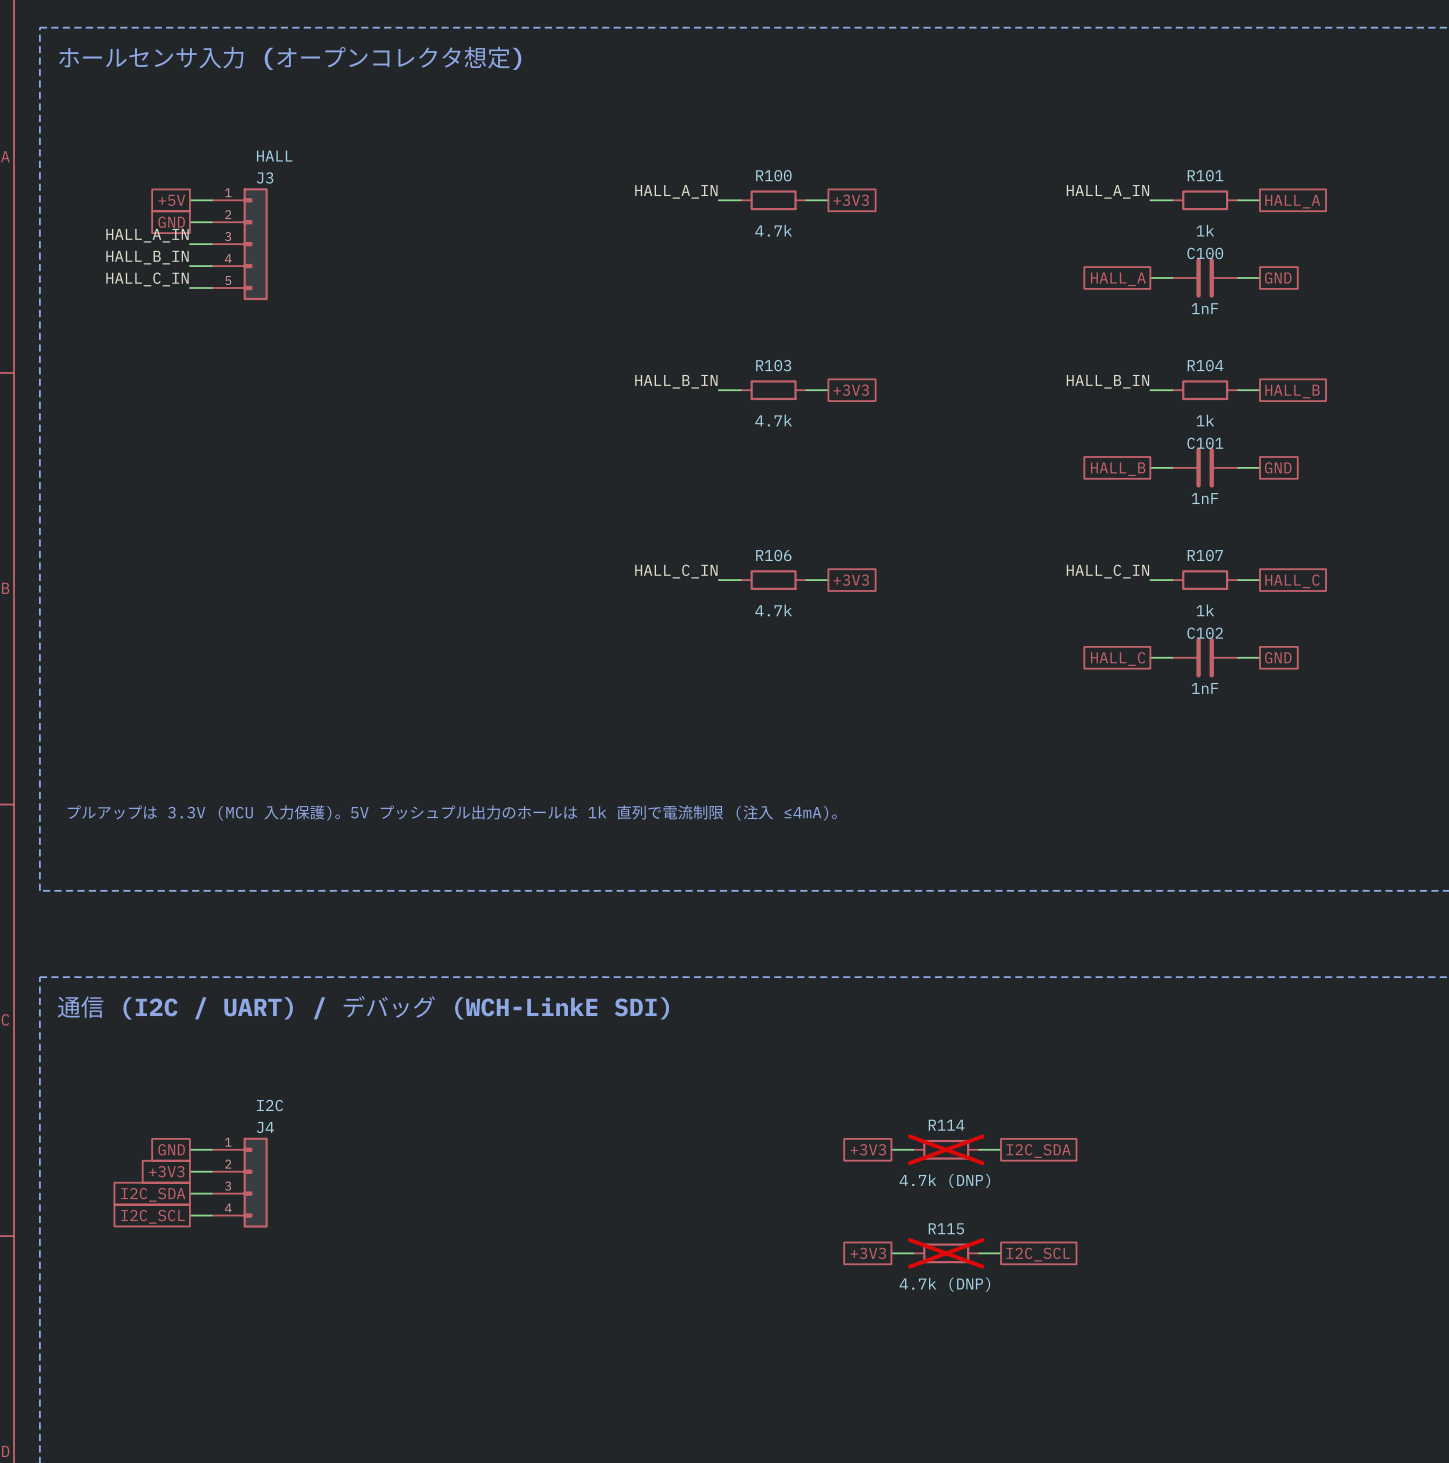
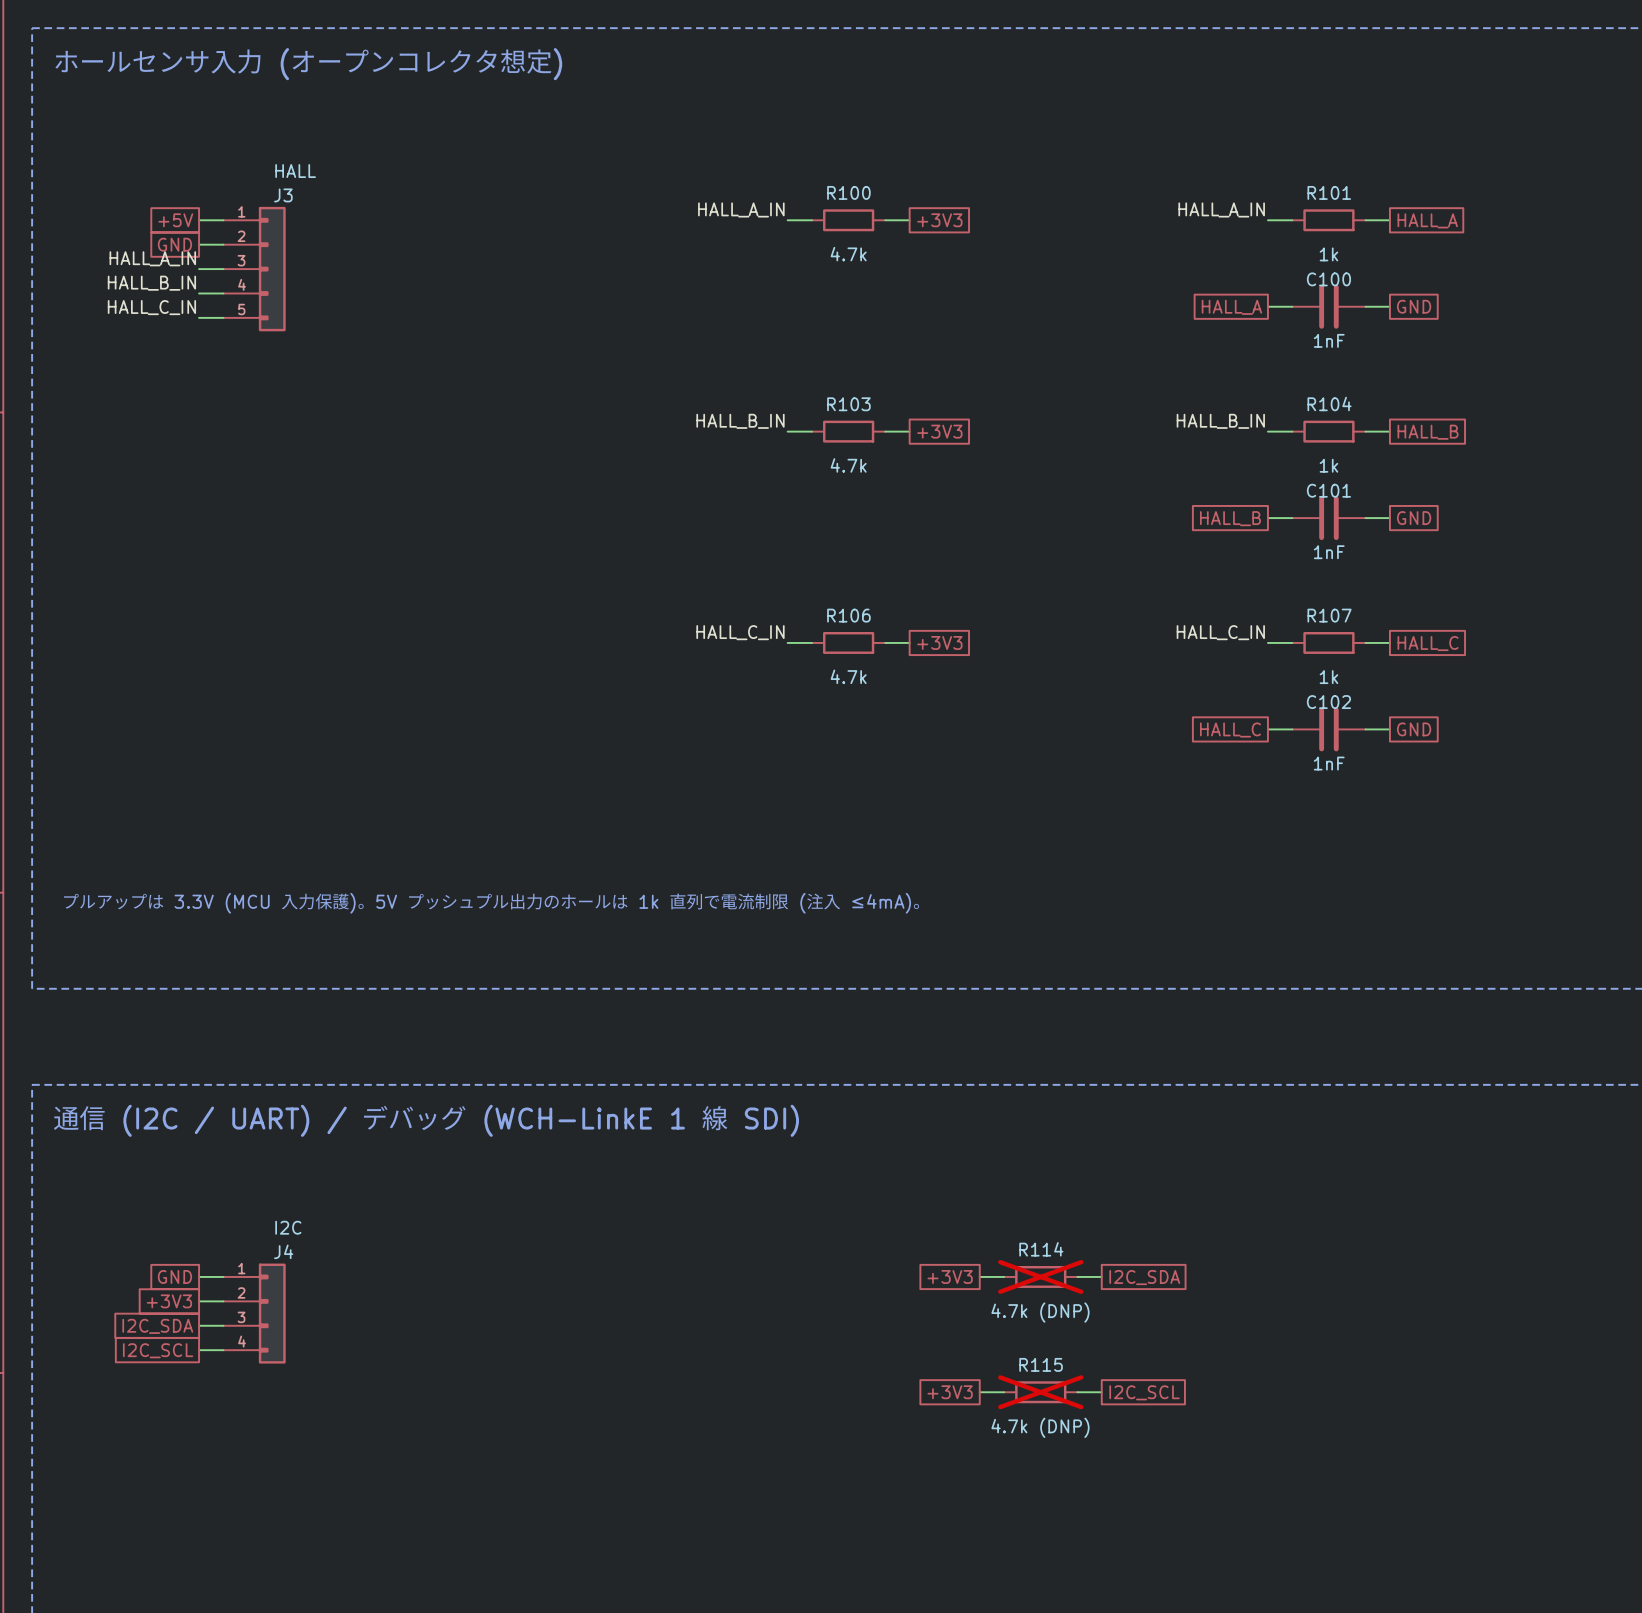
text: 通信 (I2C / UART) / デバッグ (WCH-LinkE SDI) (363, 1007) -> 通信 (I2C / UART) / デバッグ (WCH-LinkE 1 線 SDI) (425, 1120)

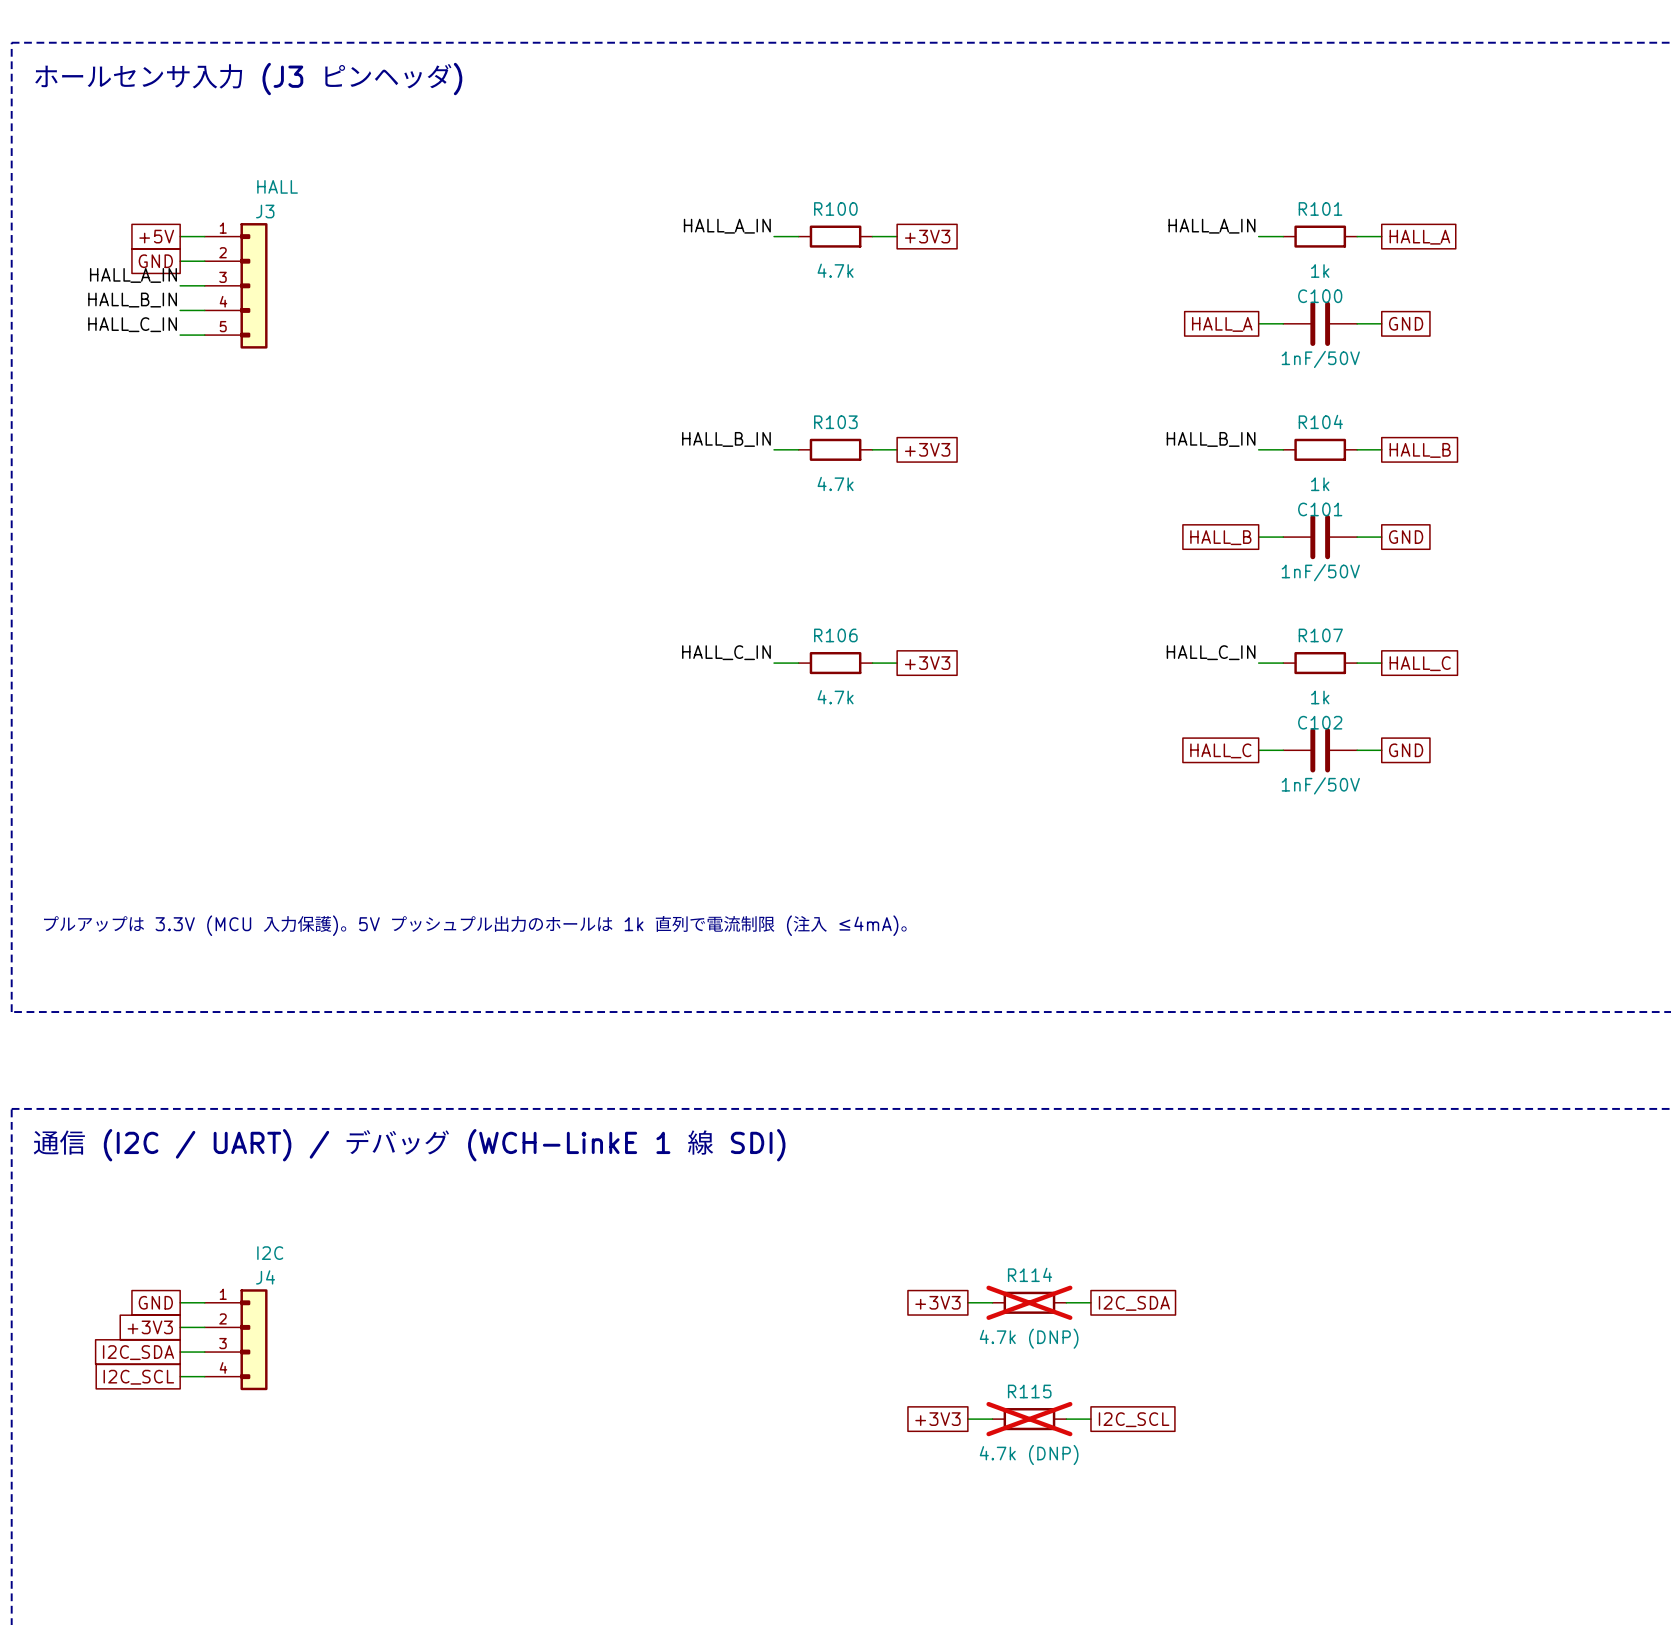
text: ホールセンサ入力 (オープンコレクタ想定) (308, 64) -> ホールセンサ入力 (J3 ピンヘッダ) (247, 78)
C100 value: 1nF (1329, 340) -> 1nF/50V (1320, 359)
C101 value: 1nF (1329, 552) -> 1nF/50V (1320, 572)
C102 value: 1nF (1329, 763) -> 1nF/50V (1320, 785)

